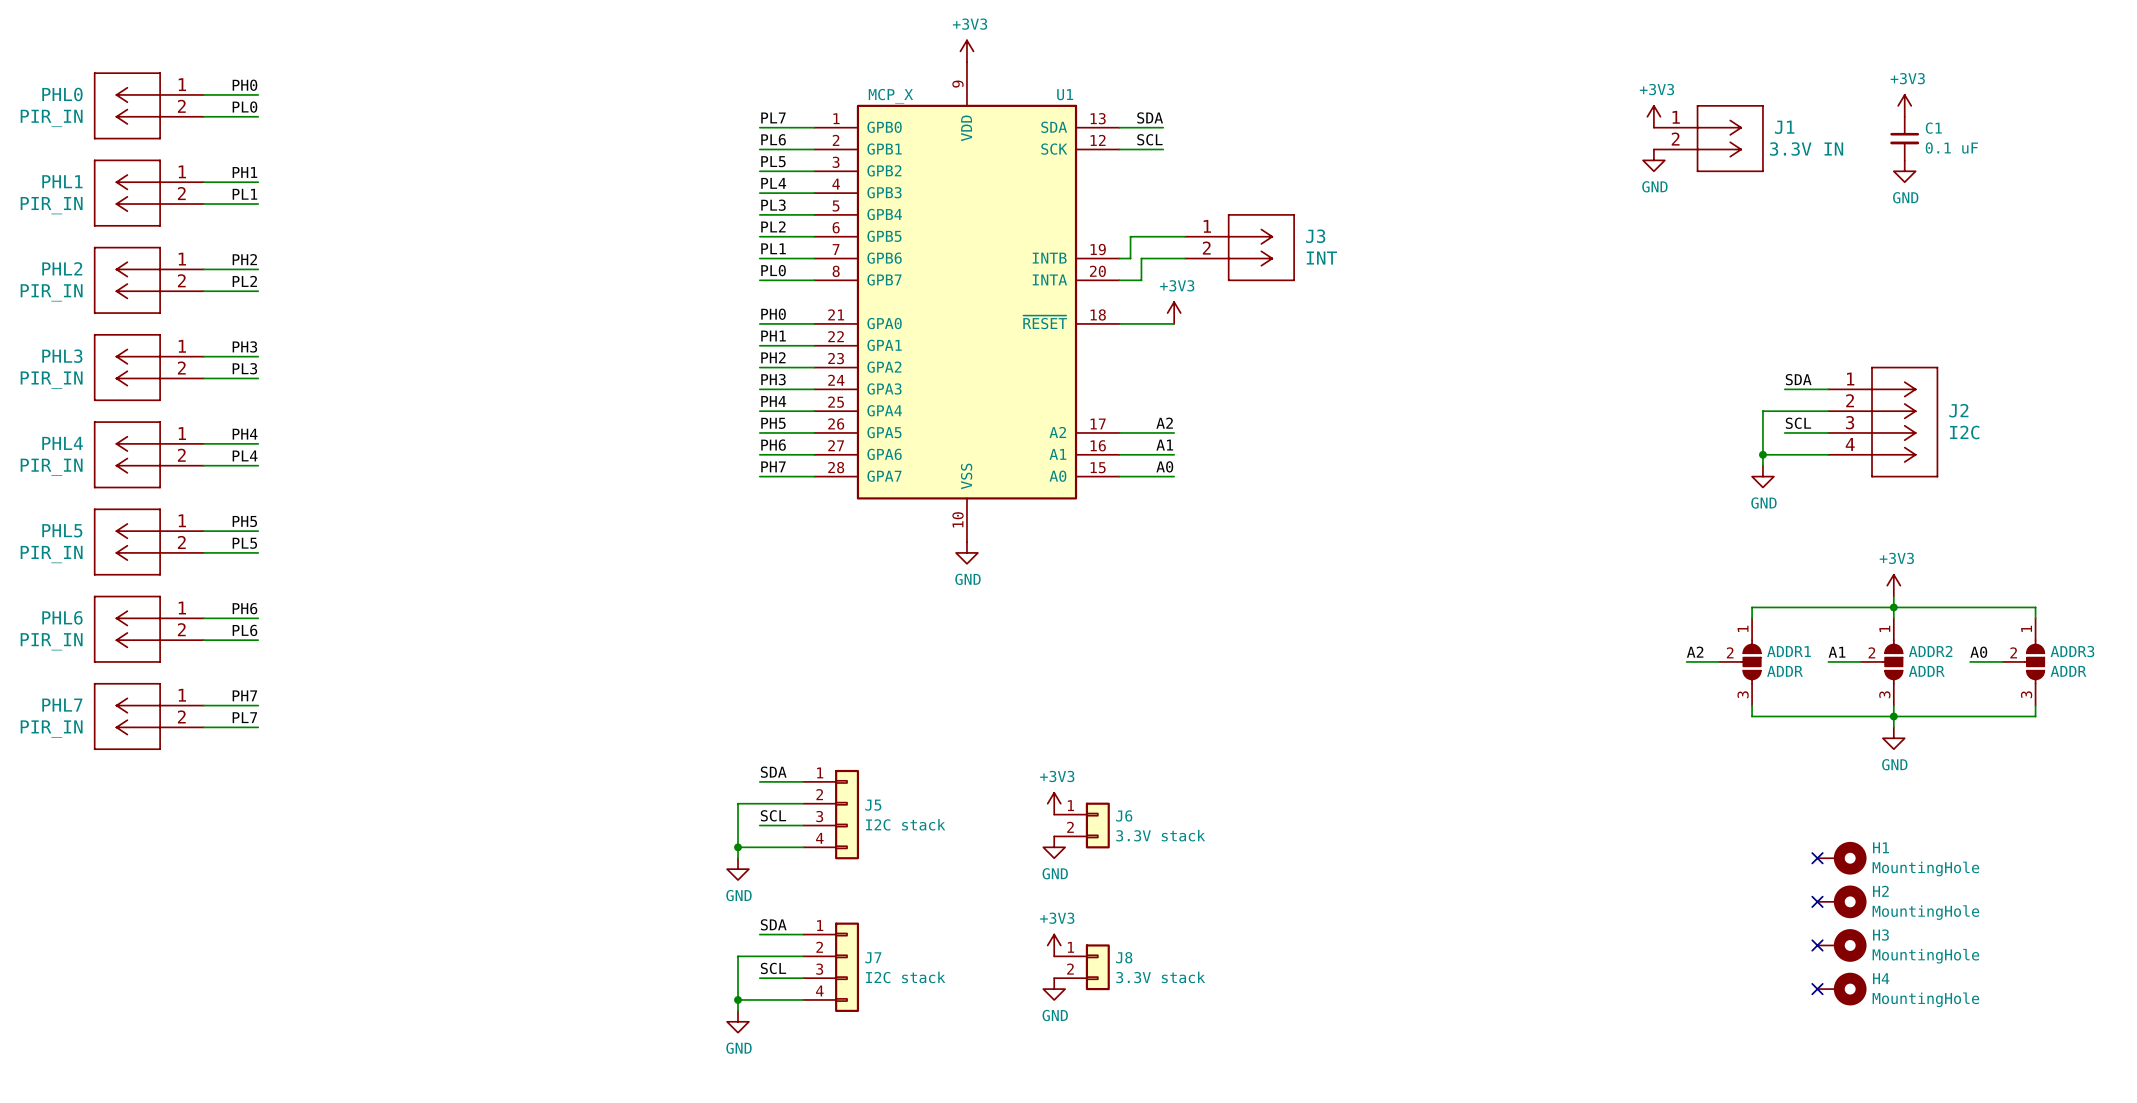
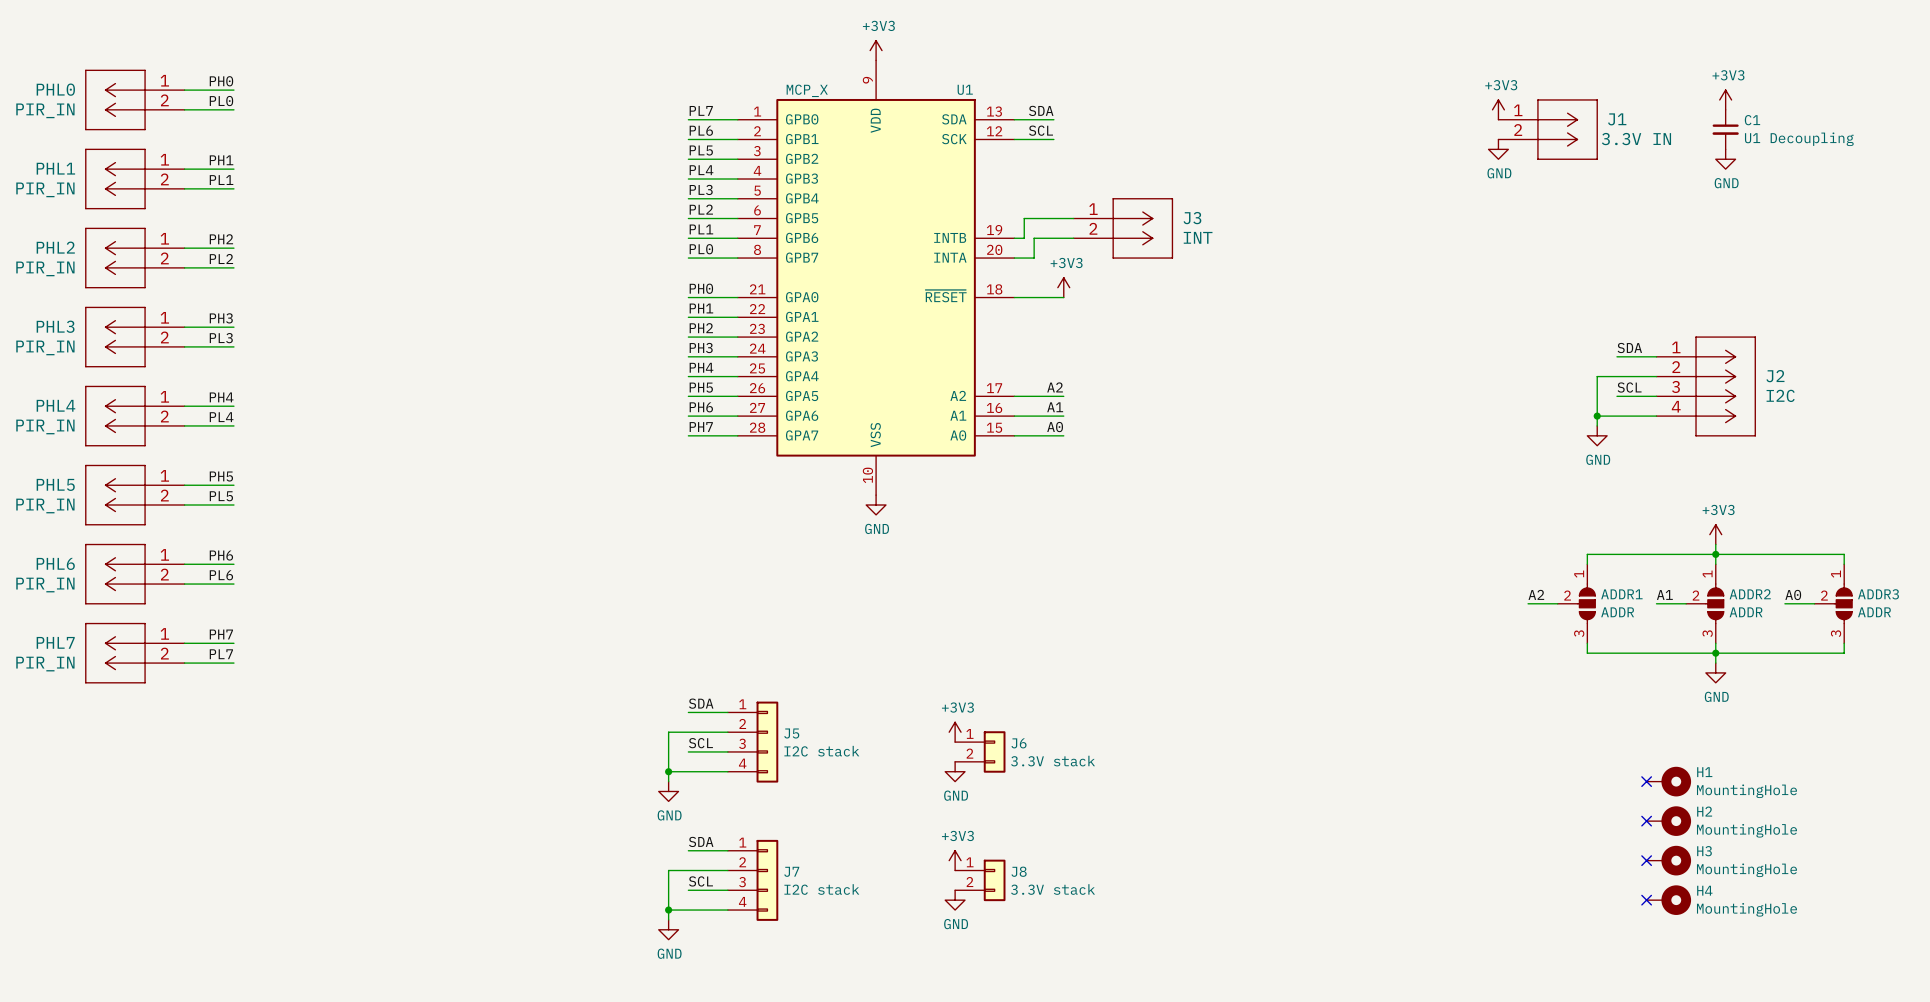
C1 value: 0.1 uF (1951, 147) -> U1 Decoupling (1799, 139)

